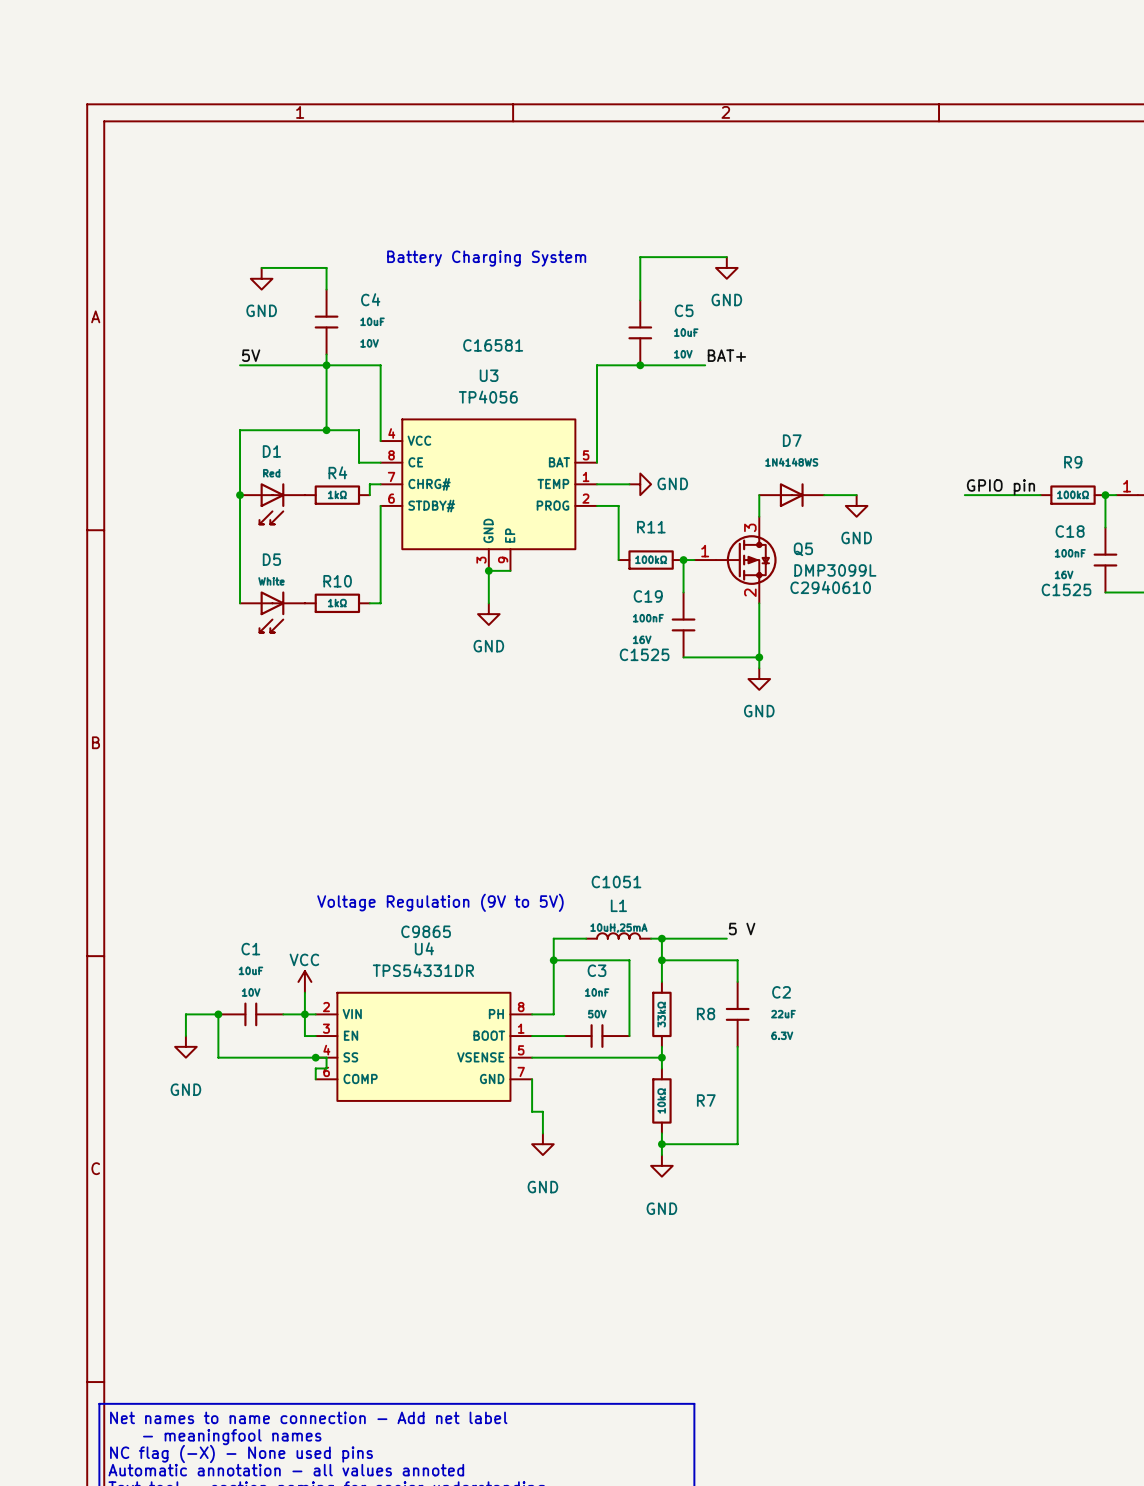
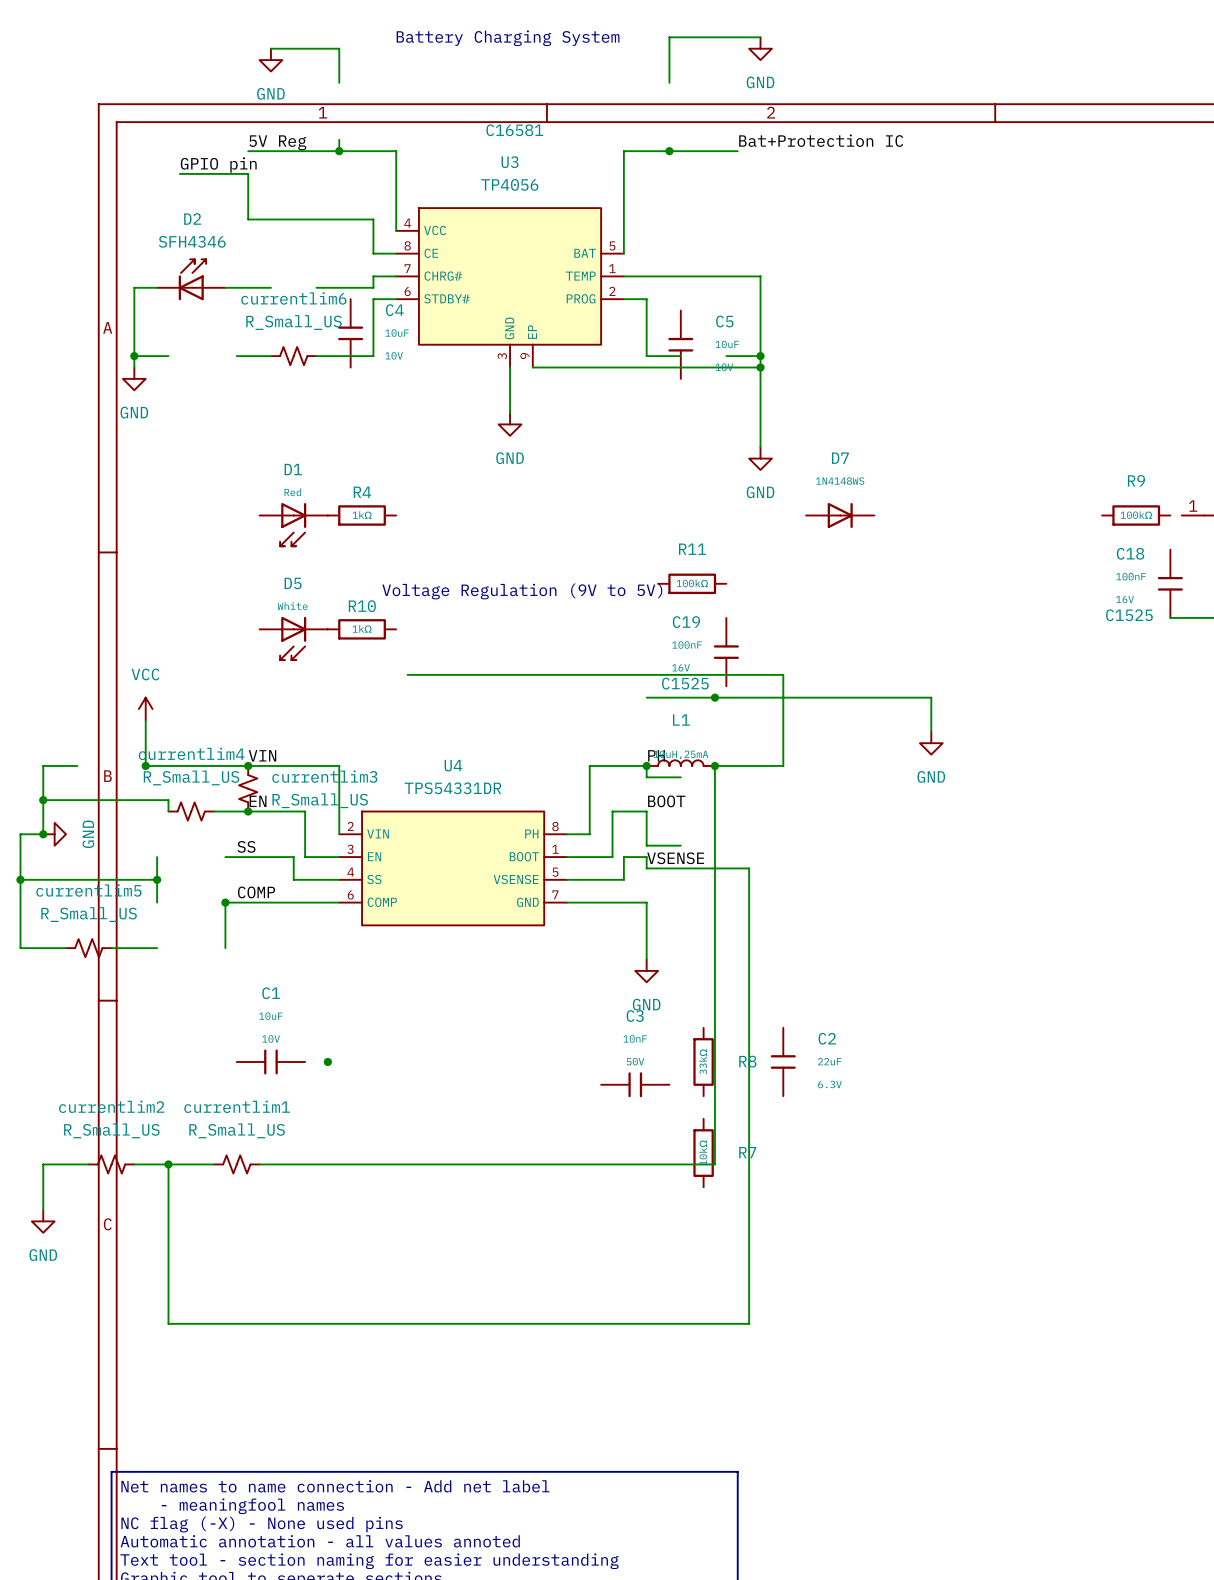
wire: none -> (760, 37) (669, 37) (669, 82)
text: none -> Battery Charging System (508, 38)
wire: none -> (270, 48) (339, 48) (339, 82)
power symbol: none -> GND (760, 48)
power symbol: none -> GND (270, 60)
wire: none -> (339, 139) (339, 151)
label: none -> Bat+Protection IC (821, 140)
label: none -> 5V Reg (277, 142)
wire: none -> (248, 151) (396, 151) (396, 230)
junction: none -> (339, 151)
junction: none -> (669, 151)
wire: none -> (737, 151) (623, 151) (623, 253)
label: none -> GPIO pin (218, 165)
wire: none -> (179, 173) (248, 173) (248, 219) (373, 219) (373, 253) (396, 253)
wire: (726, 257) (640, 257) (640, 300) -> none
text: Battery Charging System (486, 258) -> none
wire: (261, 267) (326, 267) (326, 289) -> none
wire: none -> (396, 276) (373, 276) (373, 287) (316, 287)
wire: none -> (623, 276) (760, 276) (760, 447)
power symbol: GND (726, 267) -> none
D2: none -> SFH4346 (191, 279)
wire: none -> (157, 287) (134, 287) (134, 367)
wire: none -> (225, 287) (270, 287)
power symbol: GND (261, 278) -> none
wire: none -> (396, 299) (373, 299) (373, 356) (316, 356)
wire: none -> (623, 299) (646, 299) (646, 356) (680, 356)
wire: none -> (134, 356) (168, 356)
junction: none -> (134, 356)
wire: none -> (236, 356) (270, 356)
currentlim6: none -> R_Small_US (293, 356)
junction: none -> (760, 356)
wire: (326, 354) (326, 430) -> none
wire: none -> (510, 367) (510, 413)
wire: none -> (532, 367) (760, 367)
junction: none -> (760, 367)
label: 5V (251, 355) -> none
label: BAT+ (726, 355) -> none
power symbol: none -> GND (134, 378)
wire: (240, 365) (380, 365) (380, 441) -> none
junction: (326, 365) -> none
junction: (640, 365) -> none
wire: (705, 365) (597, 365) (597, 462) -> none
power symbol: none -> GND (510, 424)
junction: (326, 430) -> none
power symbol: none -> GND (760, 458)
wire: (380, 462) (359, 462) (359, 430) (240, 430) (240, 603) -> none
wire: (380, 484) (369, 484) (369, 495) -> none
wire: (597, 484) (629, 484) -> (726, 356) (760, 356)
power symbol: GND (640, 484) -> none
label: GPIO pin (1000, 487) -> none
junction: (240, 495) -> none
U3 position: (488, 495) -> (510, 287)
wire: (759, 495) (759, 516) -> none
wire: (824, 495) (856, 495) -> none
wire: (964, 495) (1040, 495) -> none
junction: (1105, 495) -> none
wire: (1116, 495) (1105, 495) (1105, 527) -> none
wire: (380, 505) (380, 603) (369, 603) -> none
wire: (597, 505) (618, 505) (618, 560) -> none
power symbol: GND (856, 505) -> none
junction: (683, 560) -> none
wire: (694, 560) (683, 560) (683, 592) -> none
Q5: DMP3099L (735, 560) -> none
text: none -> Voltage Regulation (9V to 5V) (522, 591)
junction: (488, 570) -> none
wire: (510, 570) (488, 570) (488, 603) -> none
wire: (759, 603) (759, 668) -> none
power symbol: GND (488, 614) -> none
wire: (683, 657) (759, 657) -> none
junction: (759, 657) -> none
wire: none -> (646, 697) (931, 697) (931, 731)
junction: none -> (714, 697)
power symbol: none -> VCC (145, 709)
power symbol: GND (759, 679) -> none
wire: none -> (145, 720) (145, 765) (339, 765) (339, 834)
power symbol: none -> GND (931, 743)
label: none -> VIN (262, 755)
label: none -> PH (656, 755)
wire: none -> (77, 765) (43, 765) (43, 834) (20, 834) (20, 948) (66, 948)
junction: none -> (145, 765)
junction: none -> (248, 765)
junction: none -> (646, 765)
junction: none -> (714, 765)
wire: none -> (680, 777) (646, 777) (646, 765) (589, 765) (589, 834) (566, 834)
currentlim3: none -> R_Small_US (248, 788)
wire: none -> (43, 800) (168, 800) (168, 811)
junction: none -> (43, 800)
label: none -> EN (258, 801)
label: none -> BOOT (666, 801)
currentlim4: none -> R_Small_US (191, 811)
wire: none -> (214, 811) (305, 811) (305, 857) (339, 857)
junction: none -> (248, 811)
junction: none -> (43, 834)
power symbol: none -> GND (54, 834)
wire: none -> (680, 845) (646, 845) (646, 811) (612, 811) (612, 857) (566, 857)
label: none -> SS (246, 846)
wire: none -> (157, 857) (157, 902)
wire: none -> (225, 857) (293, 857) (293, 879) (339, 879)
label: none -> VSENSE (675, 858)
wire: none -> (20, 879) (157, 879)
junction: none -> (20, 879)
junction: none -> (157, 879)
wire: none -> (566, 879) (623, 879) (623, 857) (646, 857) (646, 868) (749, 868) (749, 1323) (168, 1323) (168, 1164)
label: none -> COMP (256, 892)
junction: none -> (225, 902)
wire: none -> (339, 902) (225, 902) (225, 948)
wire: none -> (566, 902) (646, 902) (646, 959)
L1 text: C1051 (616, 882) -> none
text: Voltage Regulation (9V to 5V) (440, 902) -> none
L1 name position: L1 (618, 905) -> L1 (681, 720)
currentlim5: none -> R_Small_US (88, 948)
wire: none -> (111, 948) (157, 948)
power symbol: none -> GND (646, 970)
label: 5 V (742, 929) -> none
U4 text: C9865 (426, 931) -> none
L1 position: (618, 935) -> (680, 763)
wire: (586, 938) (553, 938) (553, 1014) (532, 1014) -> none
wire: (651, 938) (726, 938) -> none
wire: (661, 938) (661, 981) -> none
junction: (661, 938) -> none
wire: (553, 960) (629, 960) (629, 1036) -> none
junction: (553, 960) -> none
wire: (661, 960) (737, 960) (737, 981) -> none
junction: (661, 960) -> none
power symbol: VCC (304, 981) -> none
wire: (304, 992) (304, 1036) (315, 1036) -> none
junction: (218, 1014) -> none
wire: (283, 1014) (315, 1014) -> none
wire: (185, 1036) (185, 1014) (218, 1014) (218, 1057) (326, 1057) (326, 1068) (315, 1068) (315, 1079) -> none
wire: (532, 1036) (564, 1036) -> none
power symbol: GND (185, 1046) -> none
U4 position: (423, 1046) -> (453, 868)
wire: (661, 1046) (661, 1068) -> none
wire: (737, 1046) (737, 1144) (661, 1144) -> none
junction: (315, 1057) -> none
wire: (532, 1057) (661, 1057) -> none
junction: (661, 1057) -> none
wire: (532, 1079) (532, 1111) -> (259, 1164) (566, 1164)
wire: none -> (88, 1164) (43, 1164) (43, 1209)
currentlim2: none -> R_Small_US (111, 1164)
wire: none -> (134, 1164) (214, 1164)
junction: none -> (168, 1164)
currentlim1: none -> R_Small_US (236, 1164)
wire: (542, 1111) (542, 1133) -> (578, 1164) (714, 1164) (714, 765) (783, 765) (783, 674) (407, 674)
wire: (661, 1133) (661, 1155) -> none
power symbol: GND (542, 1144) -> none
junction: (661, 1144) -> none
power symbol: none -> GND (43, 1221)
power symbol: GND (661, 1165) -> none

